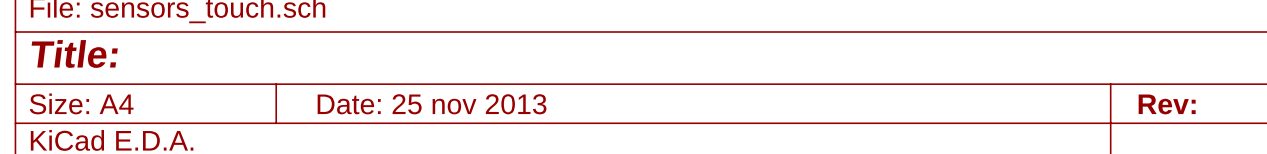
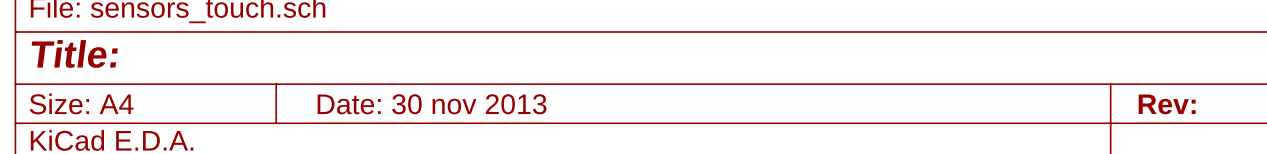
title block: Date: 25 nov 2013 (432, 104) -> Date: 30 nov 2013 (432, 104)

